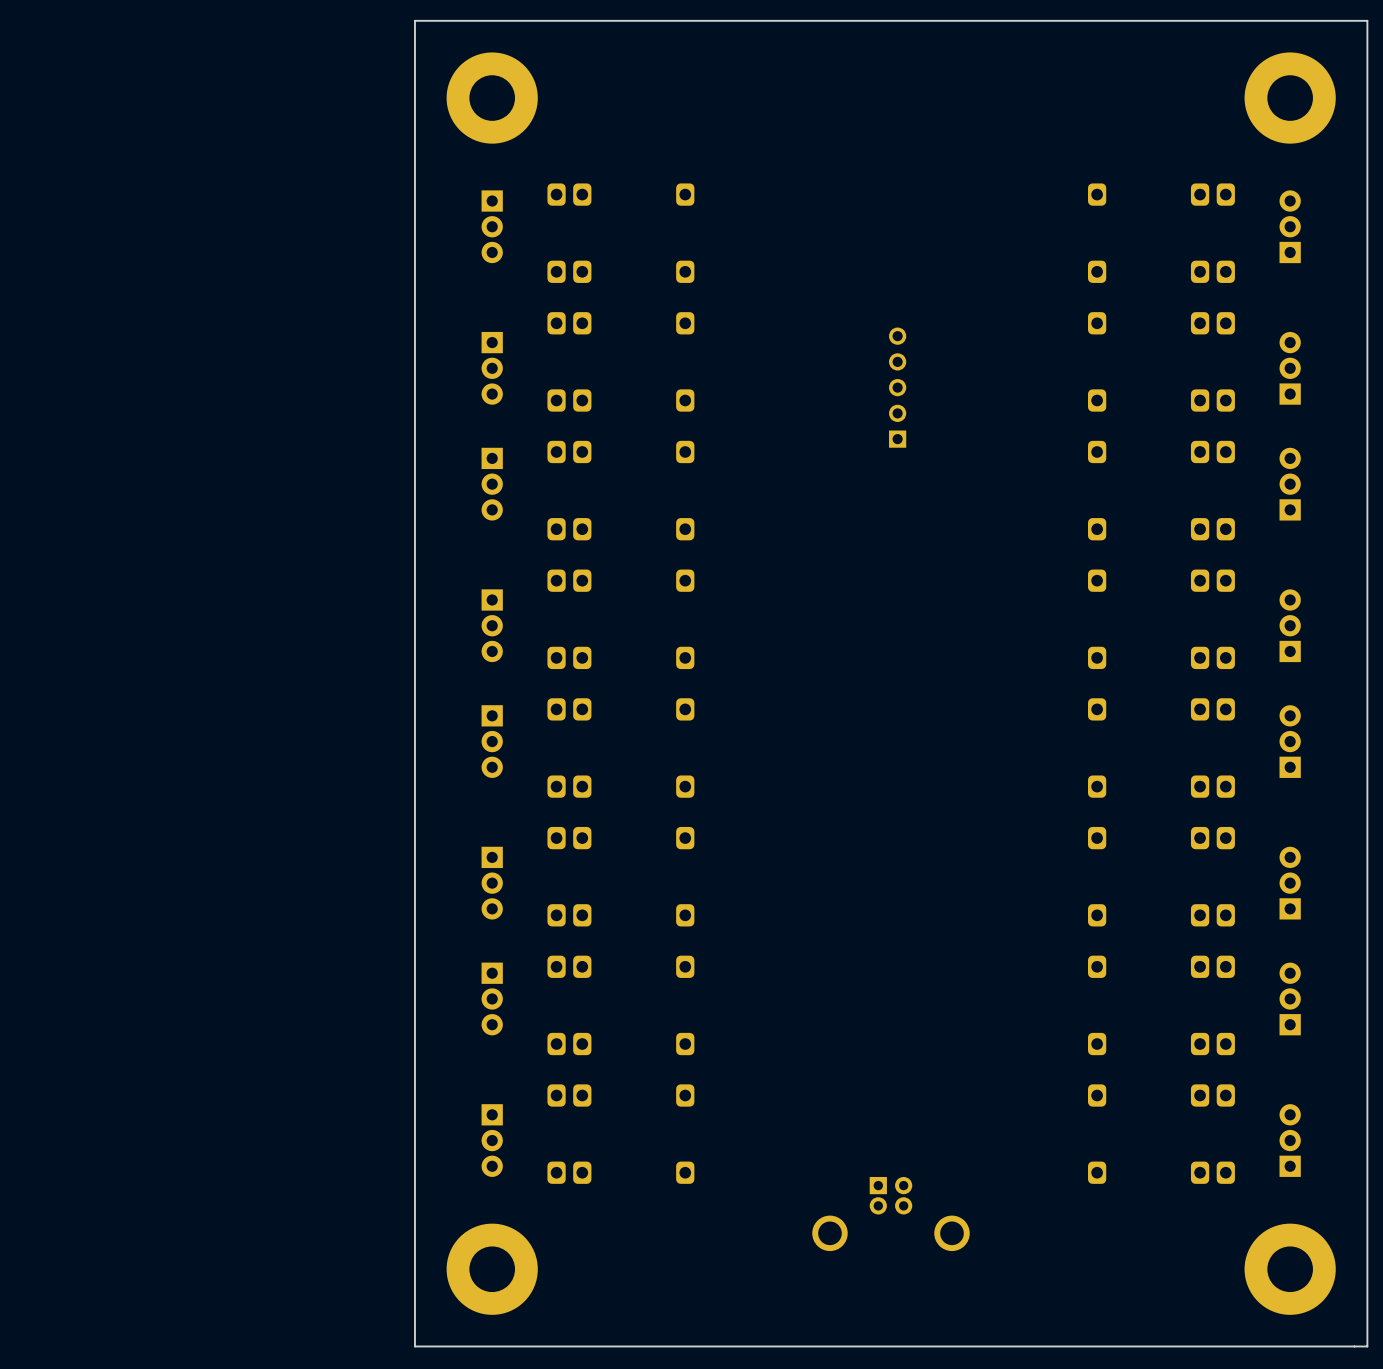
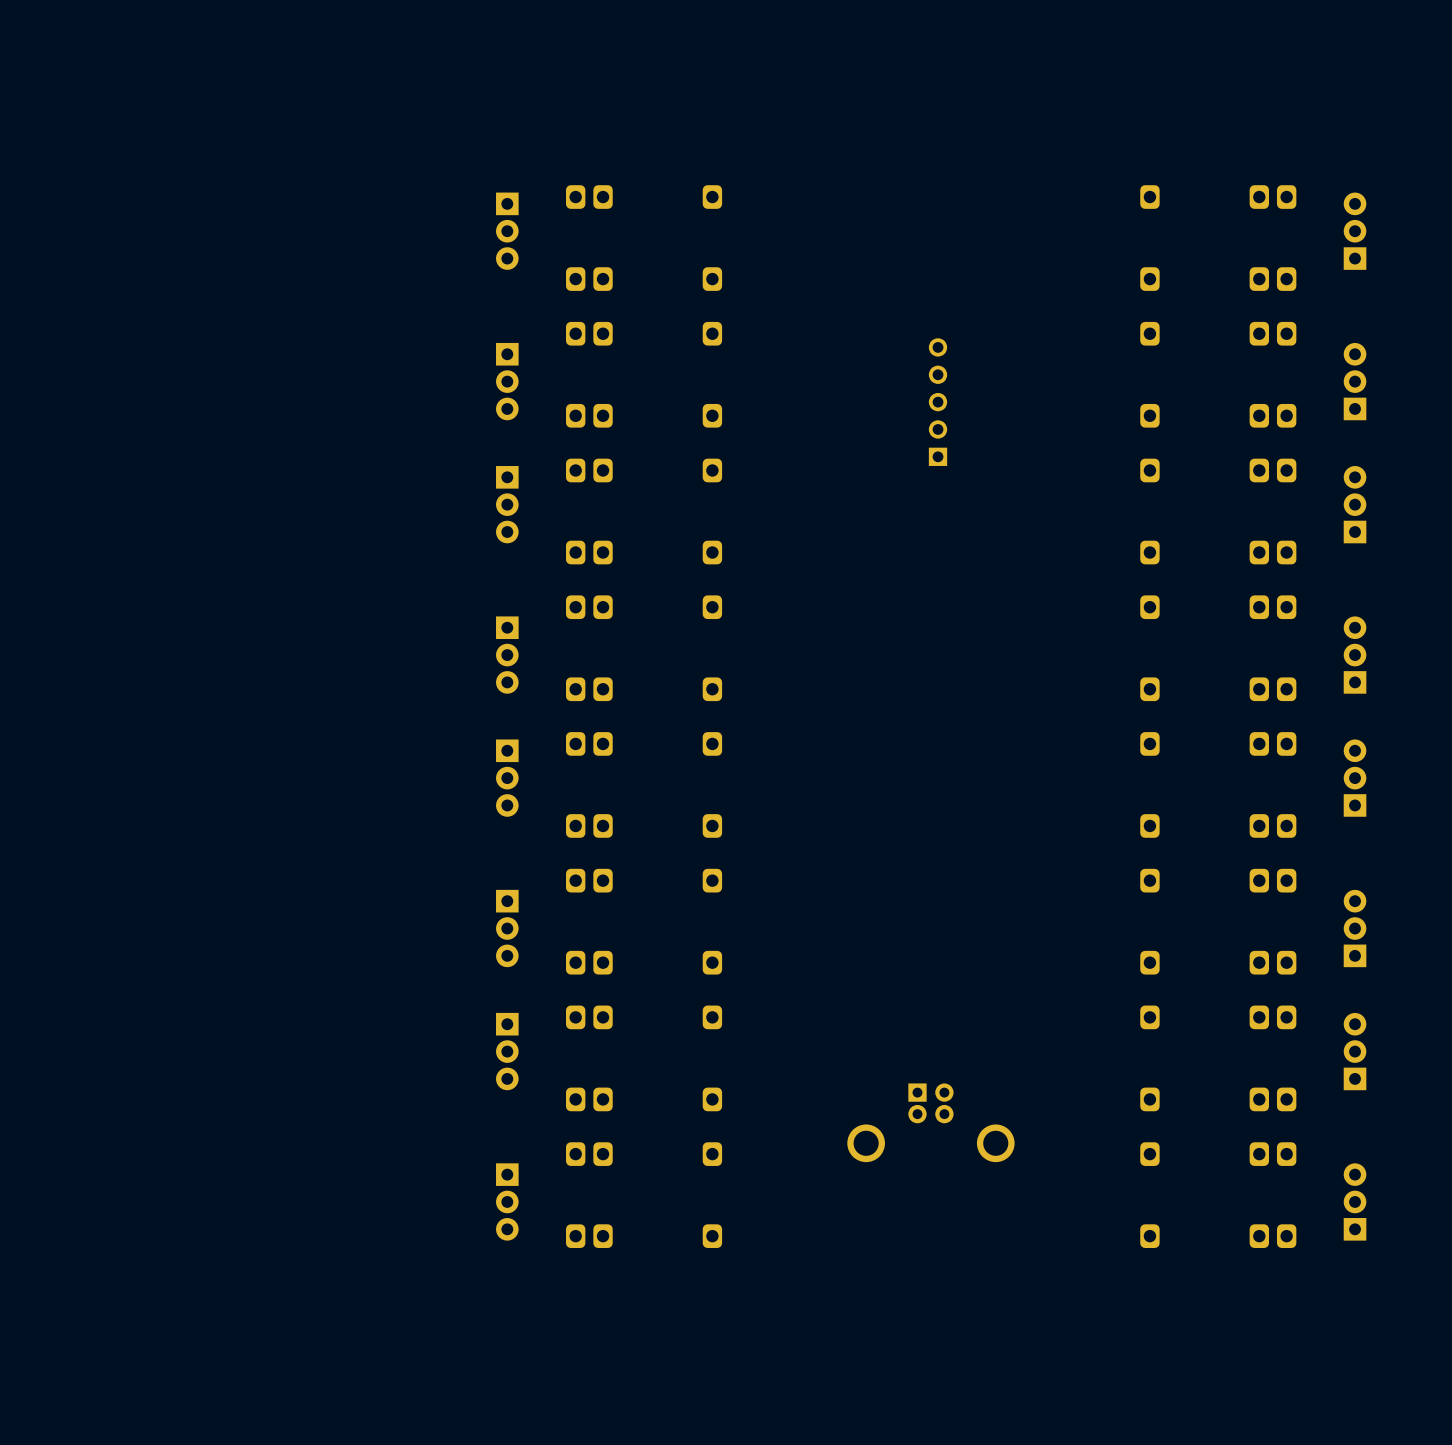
board edge: (1367, 20) (1367, 1346) (414, 1346) (414, 20) (1367, 20) -> none
part: (492, 98) -> none
part: (1290, 98) -> none
part position: (890, 1214) -> (930, 1122)
part: (492, 1269) -> none
part: (1290, 1269) -> none

